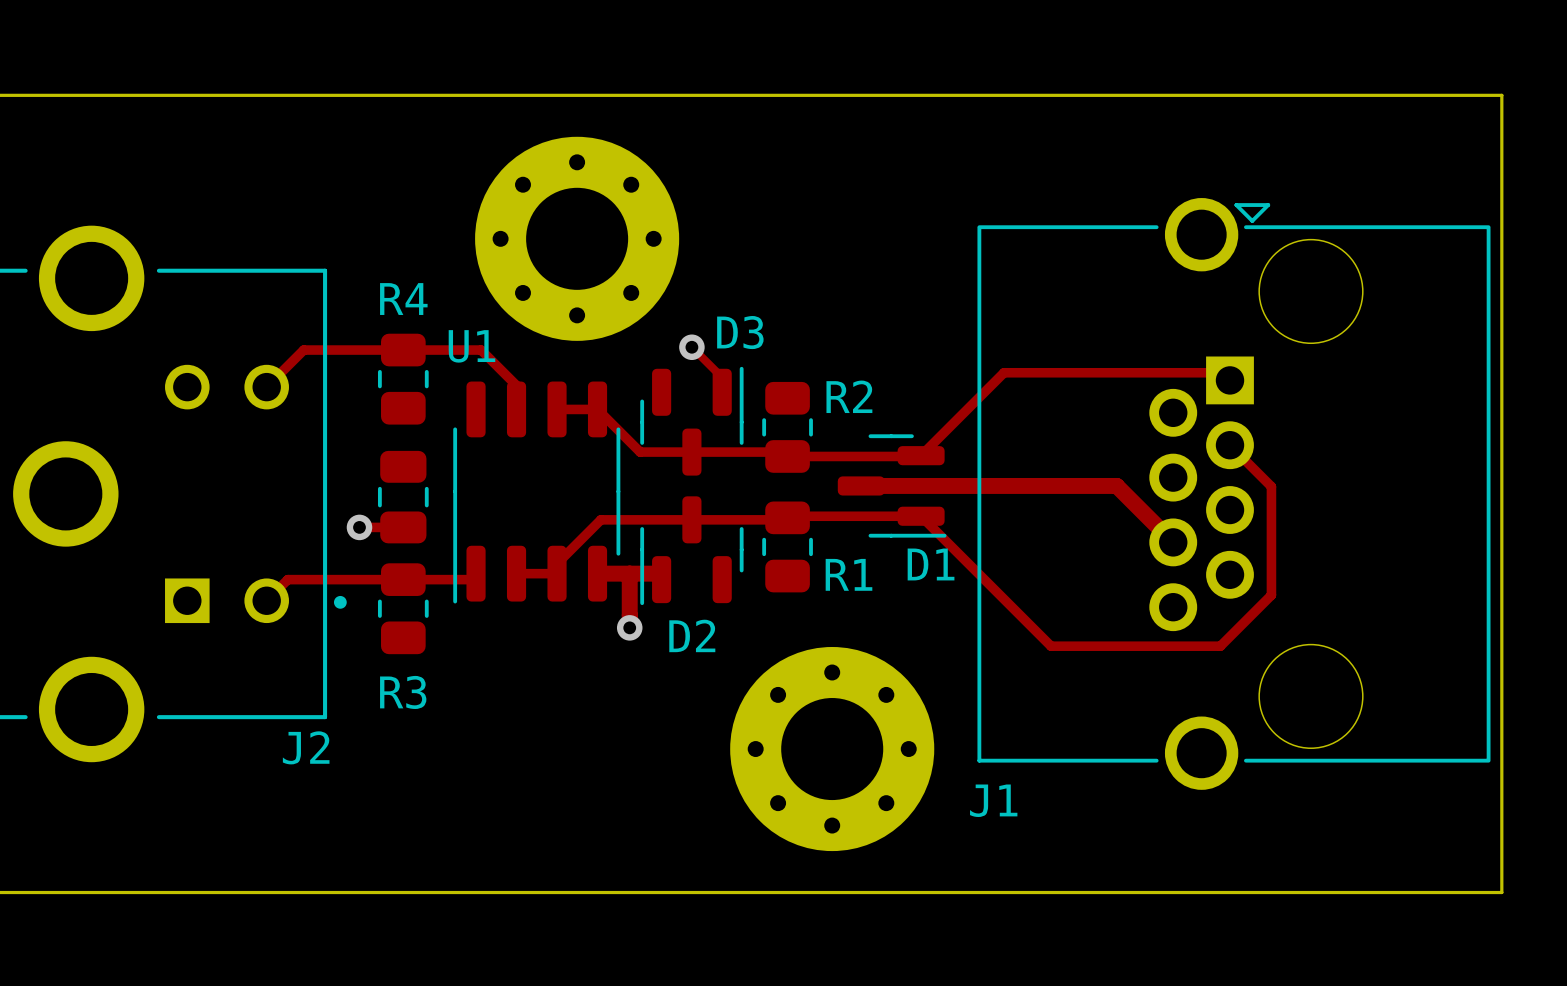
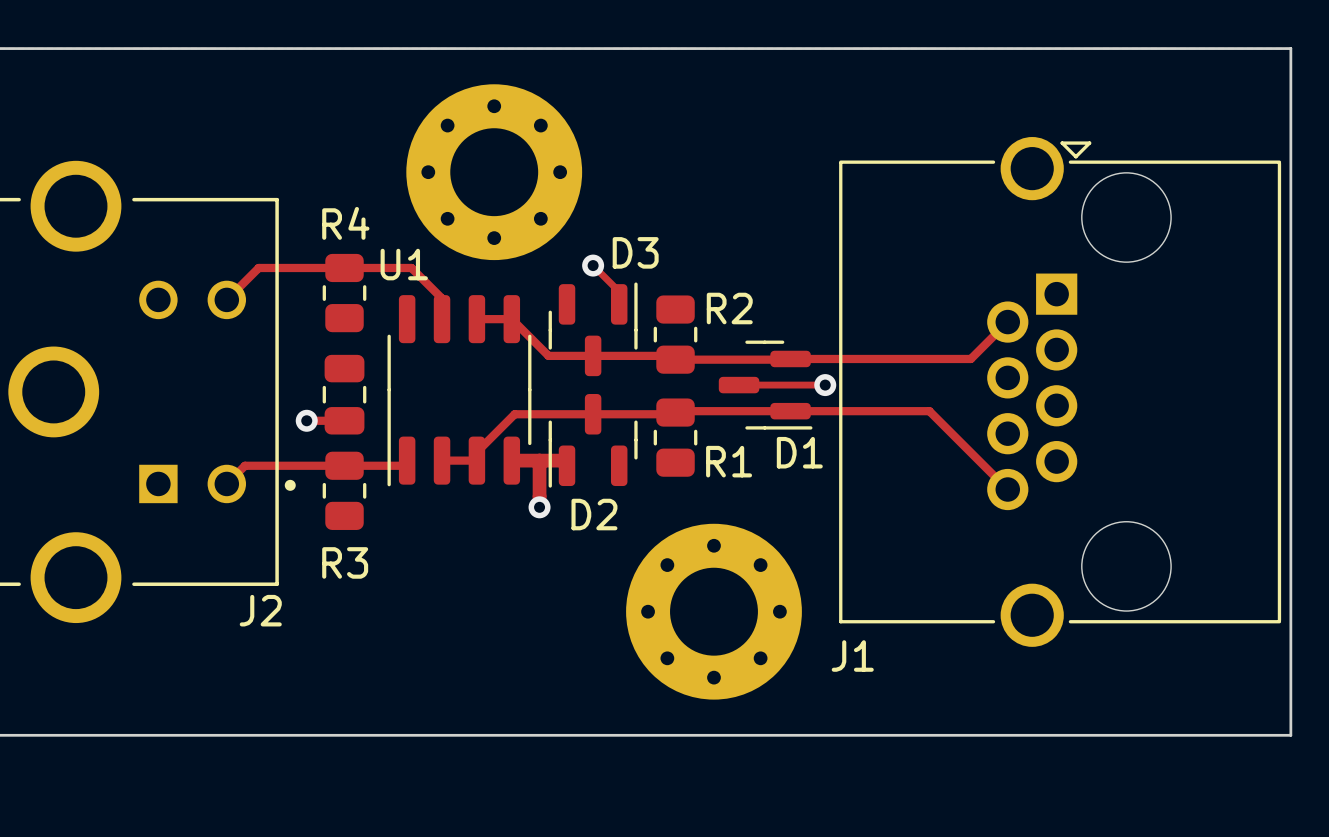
top track: (1229, 380) (1222, 372) (1004, 372) (921, 455) -> (1007, 322) (970, 358) (790, 358)
top track: (1229, 445) (1271, 486) (1271, 595) (1220, 646) (1051, 646) (921, 516) -> (1007, 489) (929, 411) (790, 411)
top track width: thick (861, 485) (961, 485) -> thin (739, 385) (825, 385)
top track: (961, 485) (1116, 485) (1173, 542) -> none
via: none -> (825, 385)

